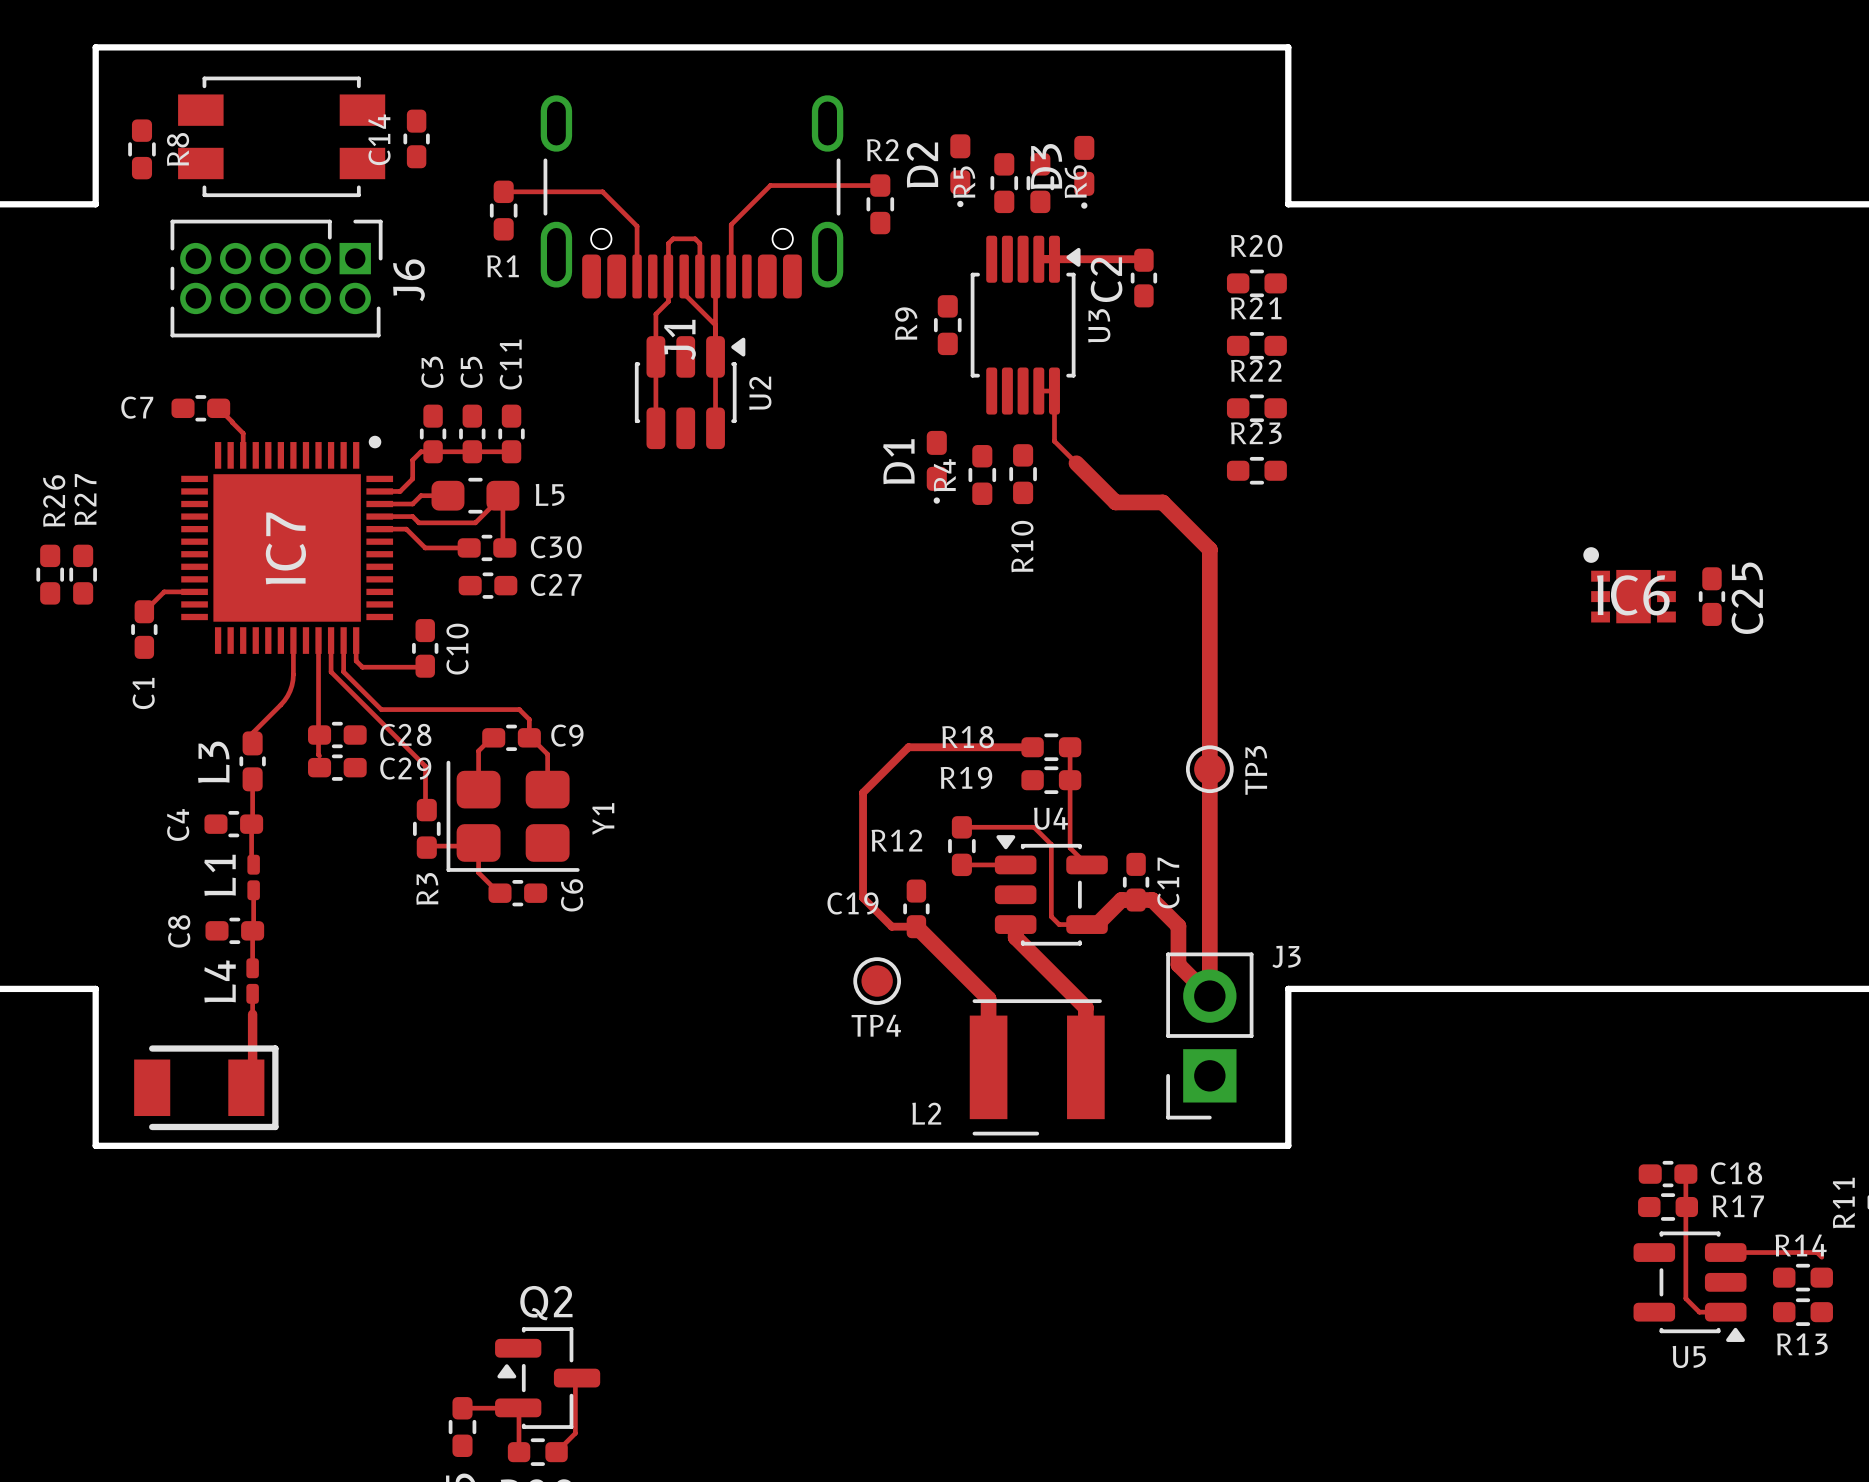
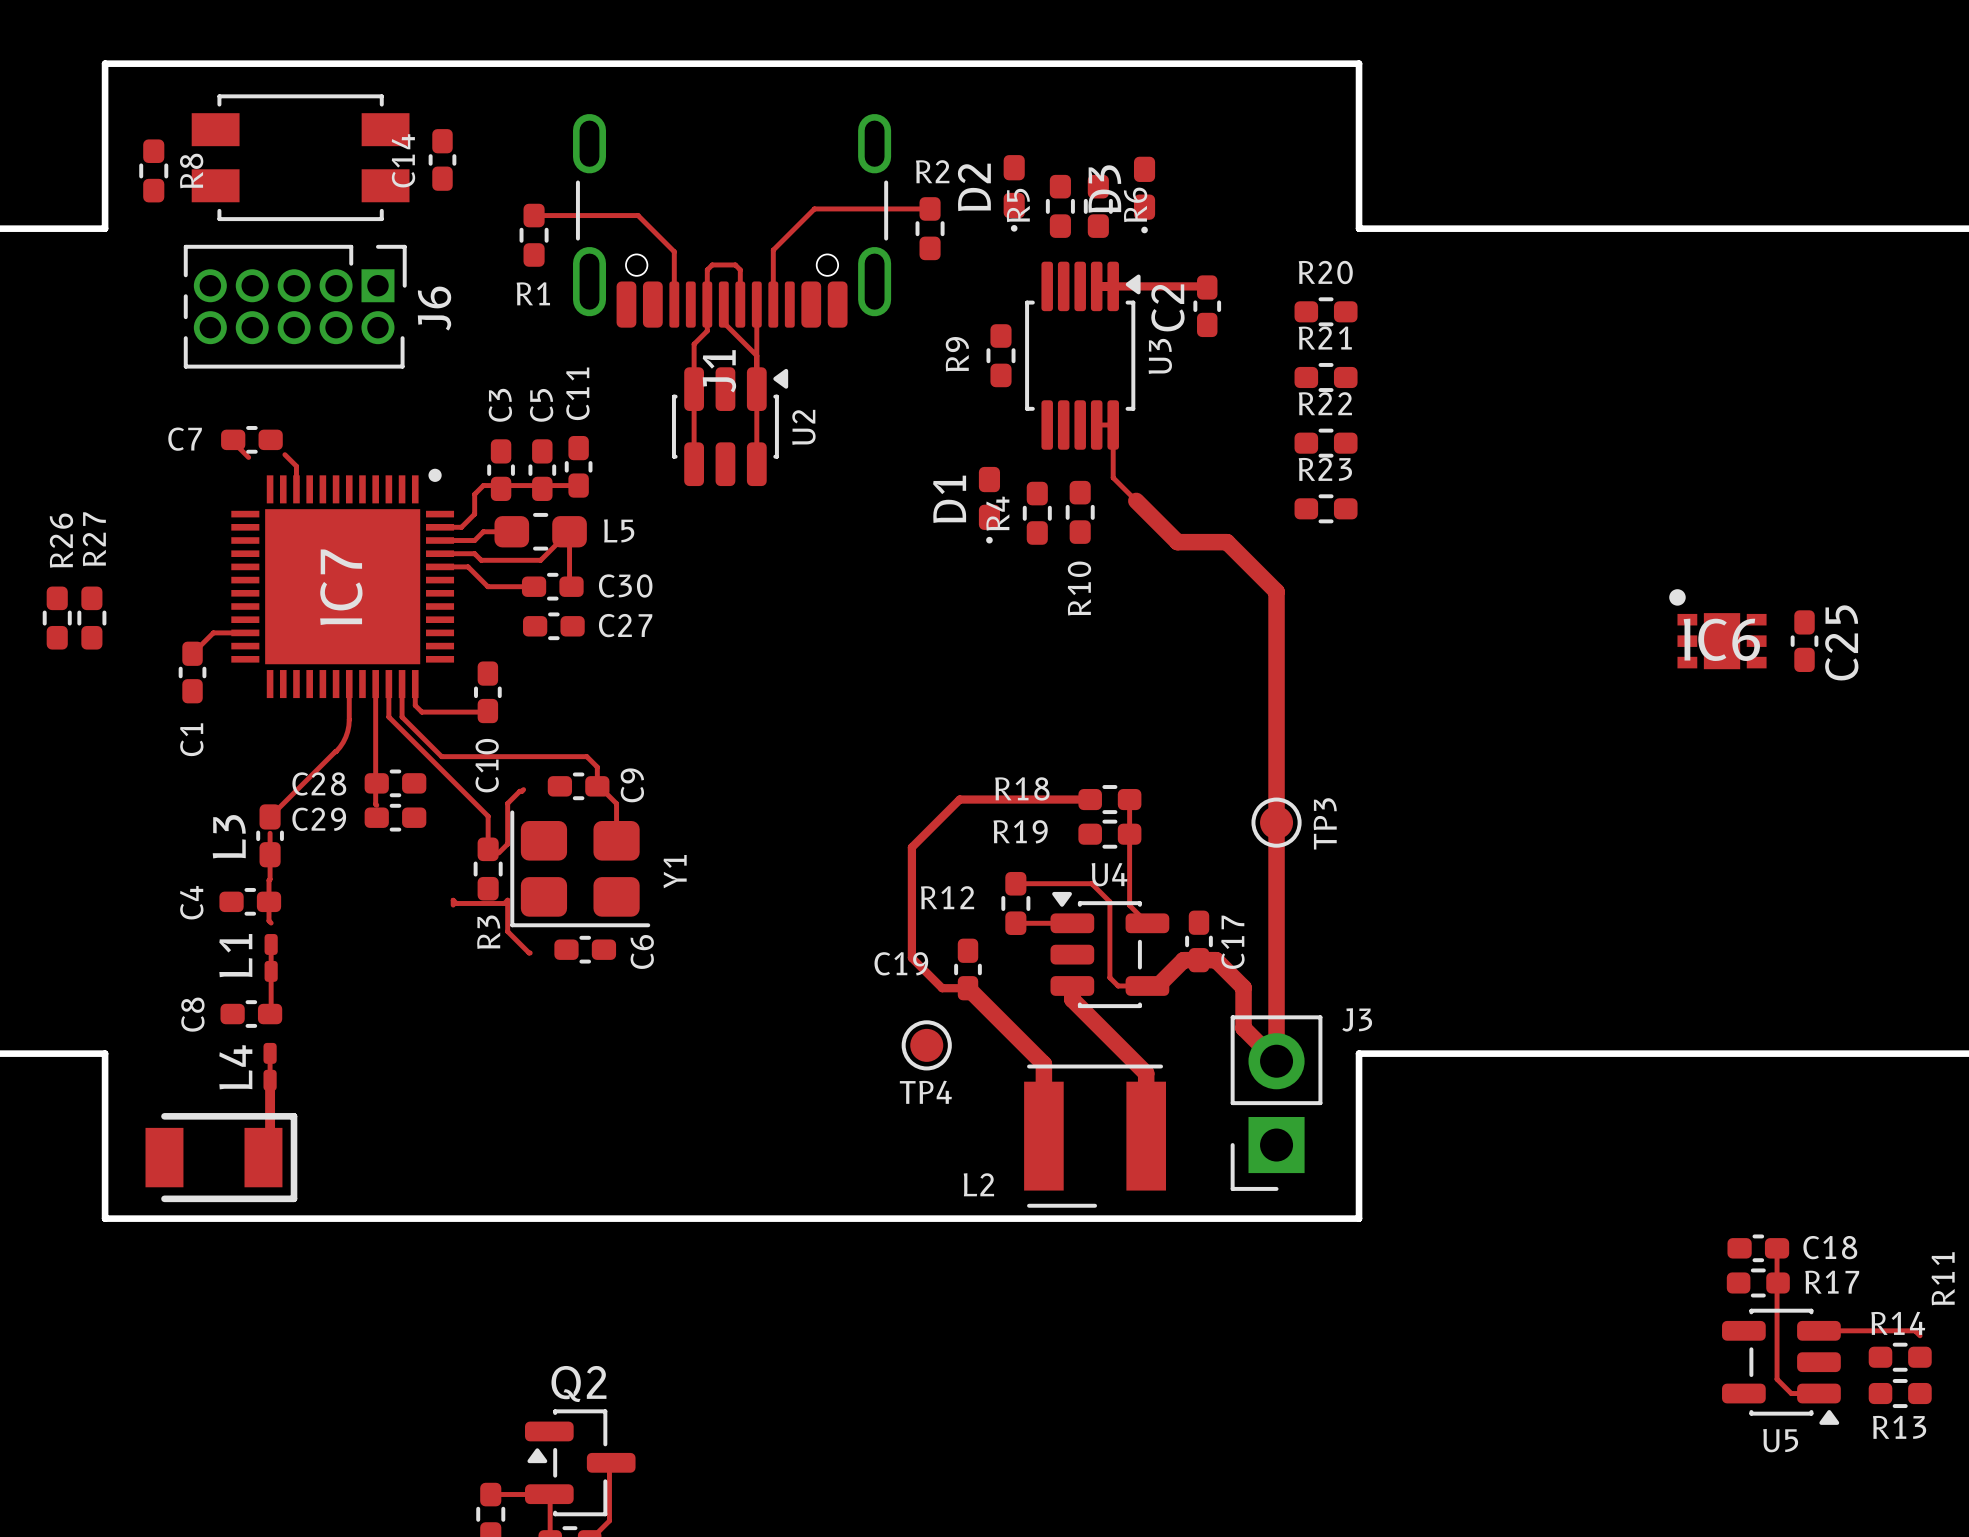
C11 name: C11 (510, 364) -> C5 (541, 405)
C5 name: C5 (471, 372) -> C3 (500, 405)
C7 position: (200, 408) -> (251, 439)
track: (232, 422) (243, 433) (243, 455) -> (284, 454) (296, 466) (296, 489)
C11: none -> (578, 466)
C3: (433, 433) -> none
track: (511, 451) (420, 451) (412, 460) (412, 478) (400, 491) (379, 491) -> (578, 485) (483, 485) (474, 494) (474, 514) (461, 527) (440, 527)
track: none -> (569, 531) (540, 560) (481, 560) (474, 553) (440, 553)
track: none -> (569, 531) (569, 584) (571, 586)
track: (447, 495) (420, 495) (412, 504) (379, 504) -> (511, 531) (483, 531) (474, 540) (440, 540)
L5 position: (475, 495) -> (540, 531)
track: (379, 516) (412, 516) (418, 522) (475, 522) (502, 495) (502, 546) (504, 547) -> none
track: (379, 529) (406, 529) (425, 547) (469, 547) -> (440, 566) (468, 566) (487, 586) (534, 586)
IC7 position: (287, 544) -> (342, 583)
C30 position: (486, 547) -> (552, 586)
C27 position: (488, 585) -> (553, 626)
track: (194, 591) (164, 591) (144, 611) -> (245, 632) (213, 632) (192, 653)
C1 position: (144, 629) -> (192, 672)
track: none -> (349, 684) (348, 725) (343, 742) (270, 816)
track: none -> (388, 684) (388, 717) (488, 816) (488, 849)
track: (293, 640) (293, 674) (290, 690) (280, 704) (252, 733) (252, 743) -> none
track: (318, 640) (319, 755) -> (375, 684) (376, 805)
track: (331, 640) (331, 671) (425, 766) (426, 810) -> none
track: (343, 640) (343, 671) (381, 709) (519, 709) (529, 719) (529, 737) (547, 754) (547, 789) -> (402, 684) (402, 717) (441, 756) (586, 756) (597, 767) (597, 786) (616, 803) (616, 840)
track: (356, 640) (356, 660) (362, 667) (425, 666) -> (415, 684) (415, 705) (421, 712) (487, 711)
C10 position: (425, 648) -> (487, 692)
C10 name position: C10 (457, 649) -> C10 (487, 765)
C28 name position: C28 (405, 734) -> C28 (319, 783)
C28 position: (337, 735) -> (395, 783)
C9 name rotation: 0° (567, 735) -> 90° counterclockwise (632, 785)
C9 position: (511, 737) -> (578, 786)
L3 position: (252, 761) -> (270, 835)
C29 position: (337, 767) -> (395, 817)
C29 name position: C29 (405, 768) -> C29 (319, 819)
Y1 position: (513, 816) -> (580, 868)
C4 position: (233, 824) -> (250, 901)
R3 position: (426, 828) -> (488, 869)
L1 position: (253, 877) -> (271, 957)
C6 position: (517, 893) -> (585, 949)
track: (253, 929) (252, 968) -> (271, 991) (270, 1014)
C8 position: (234, 930) -> (251, 1014)
L4 position: (252, 981) -> (270, 1066)

